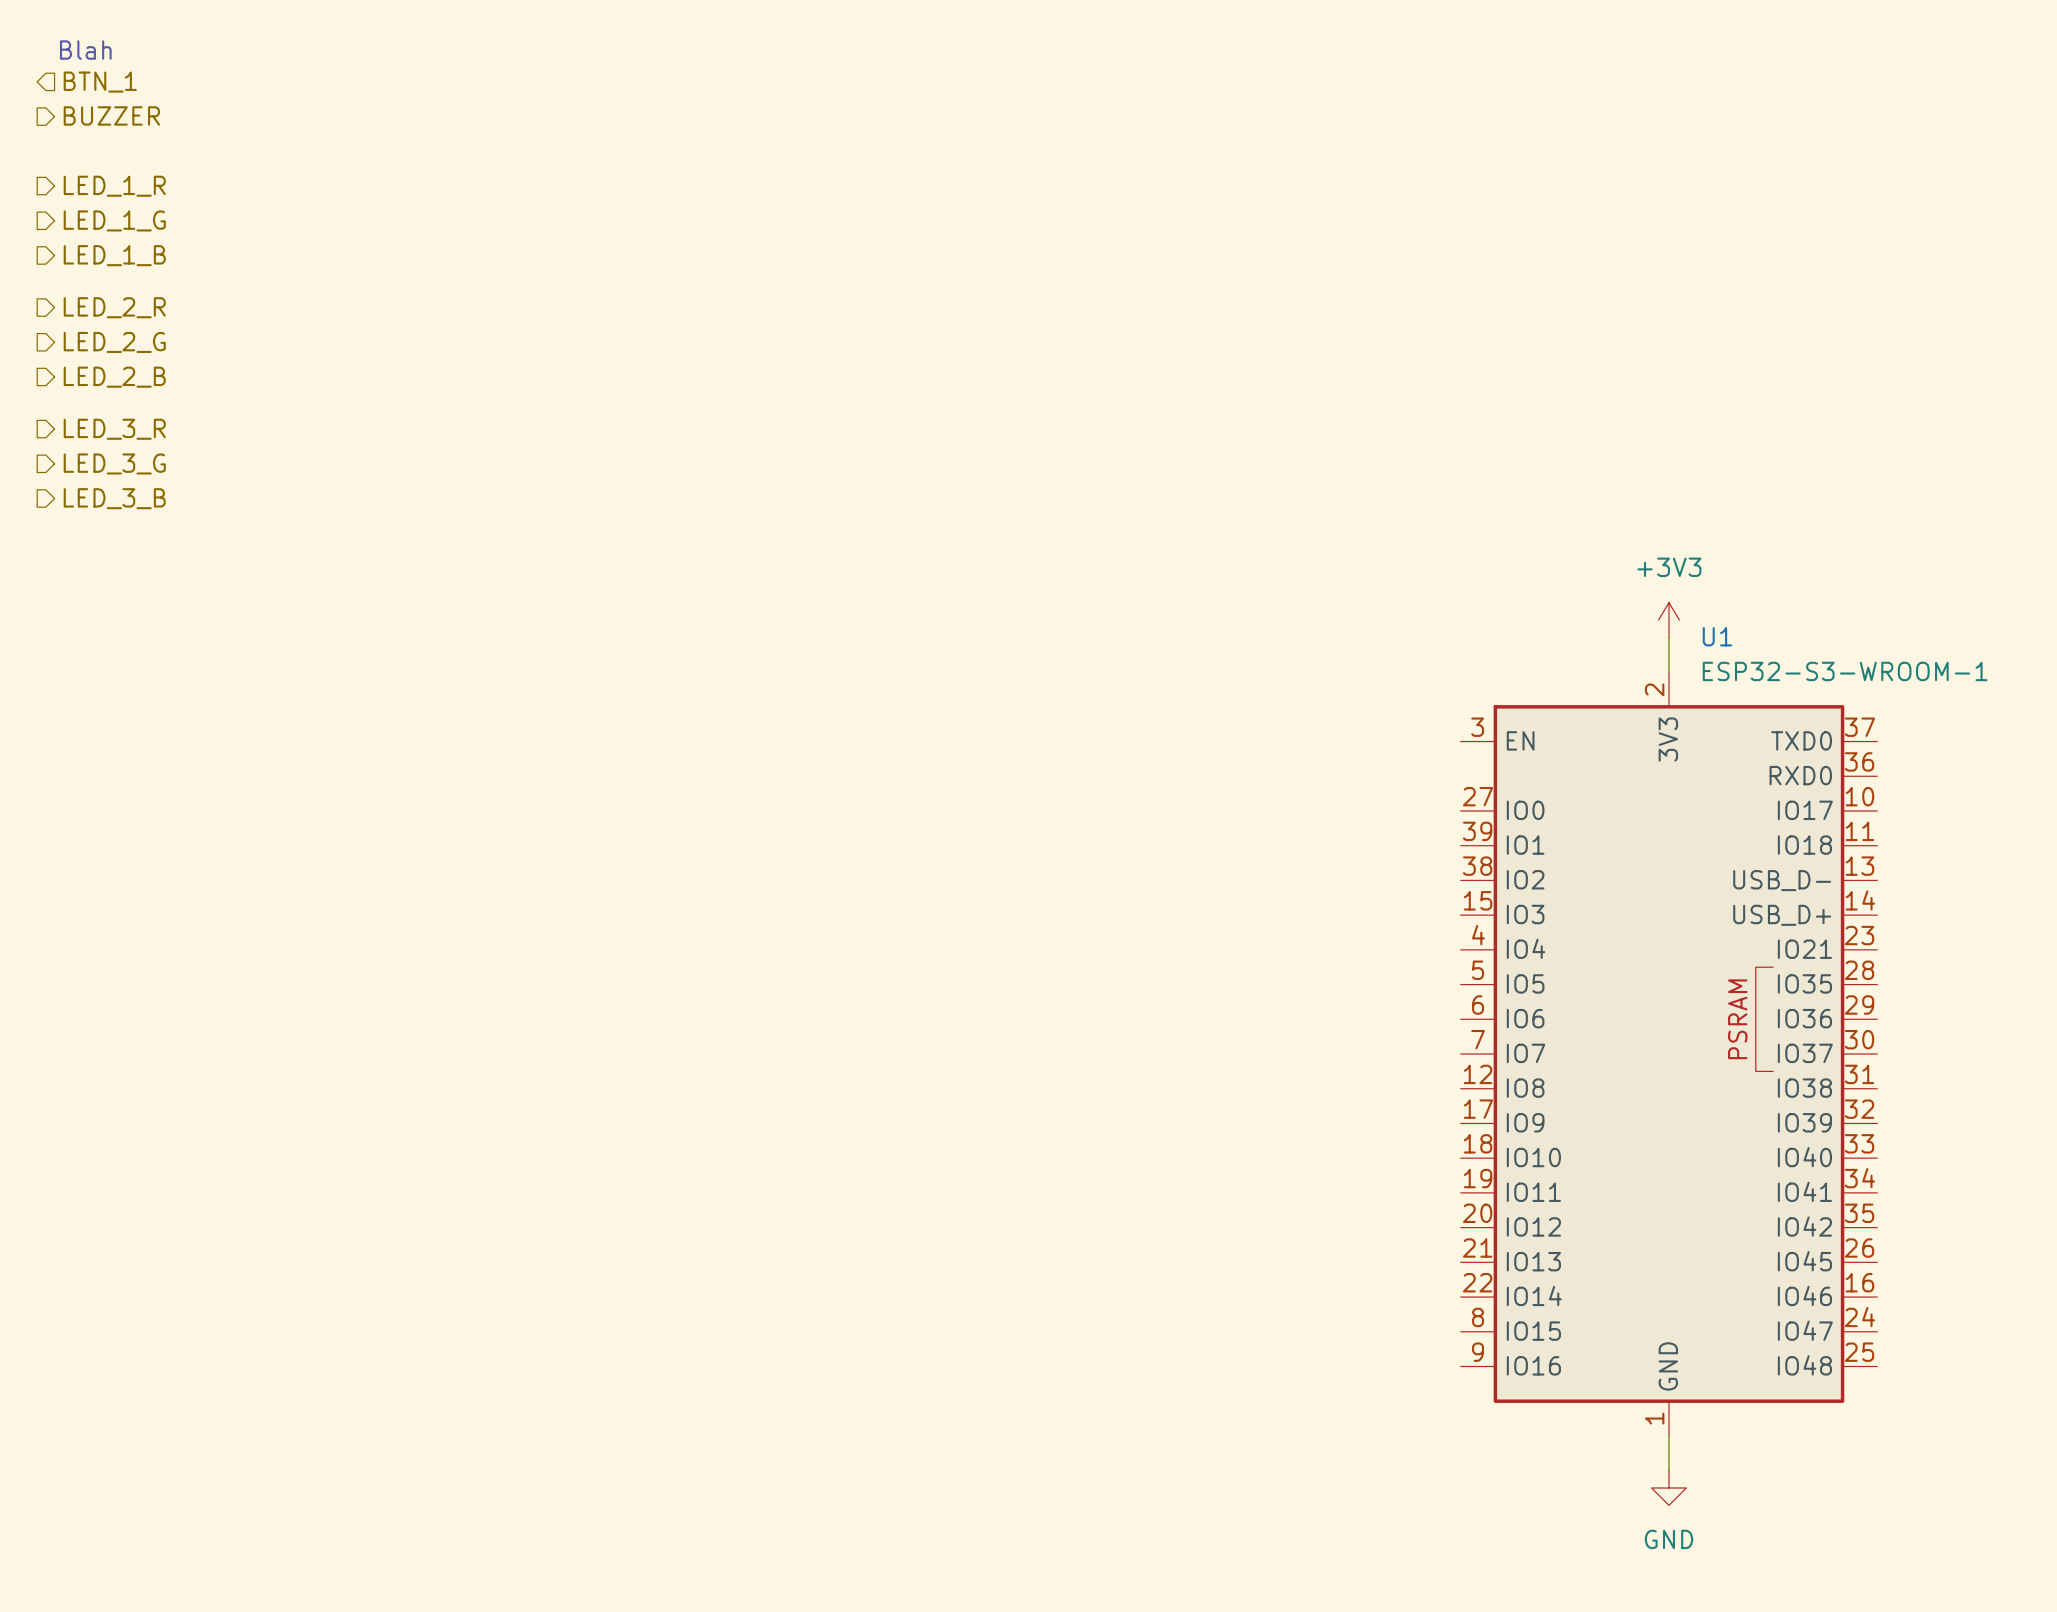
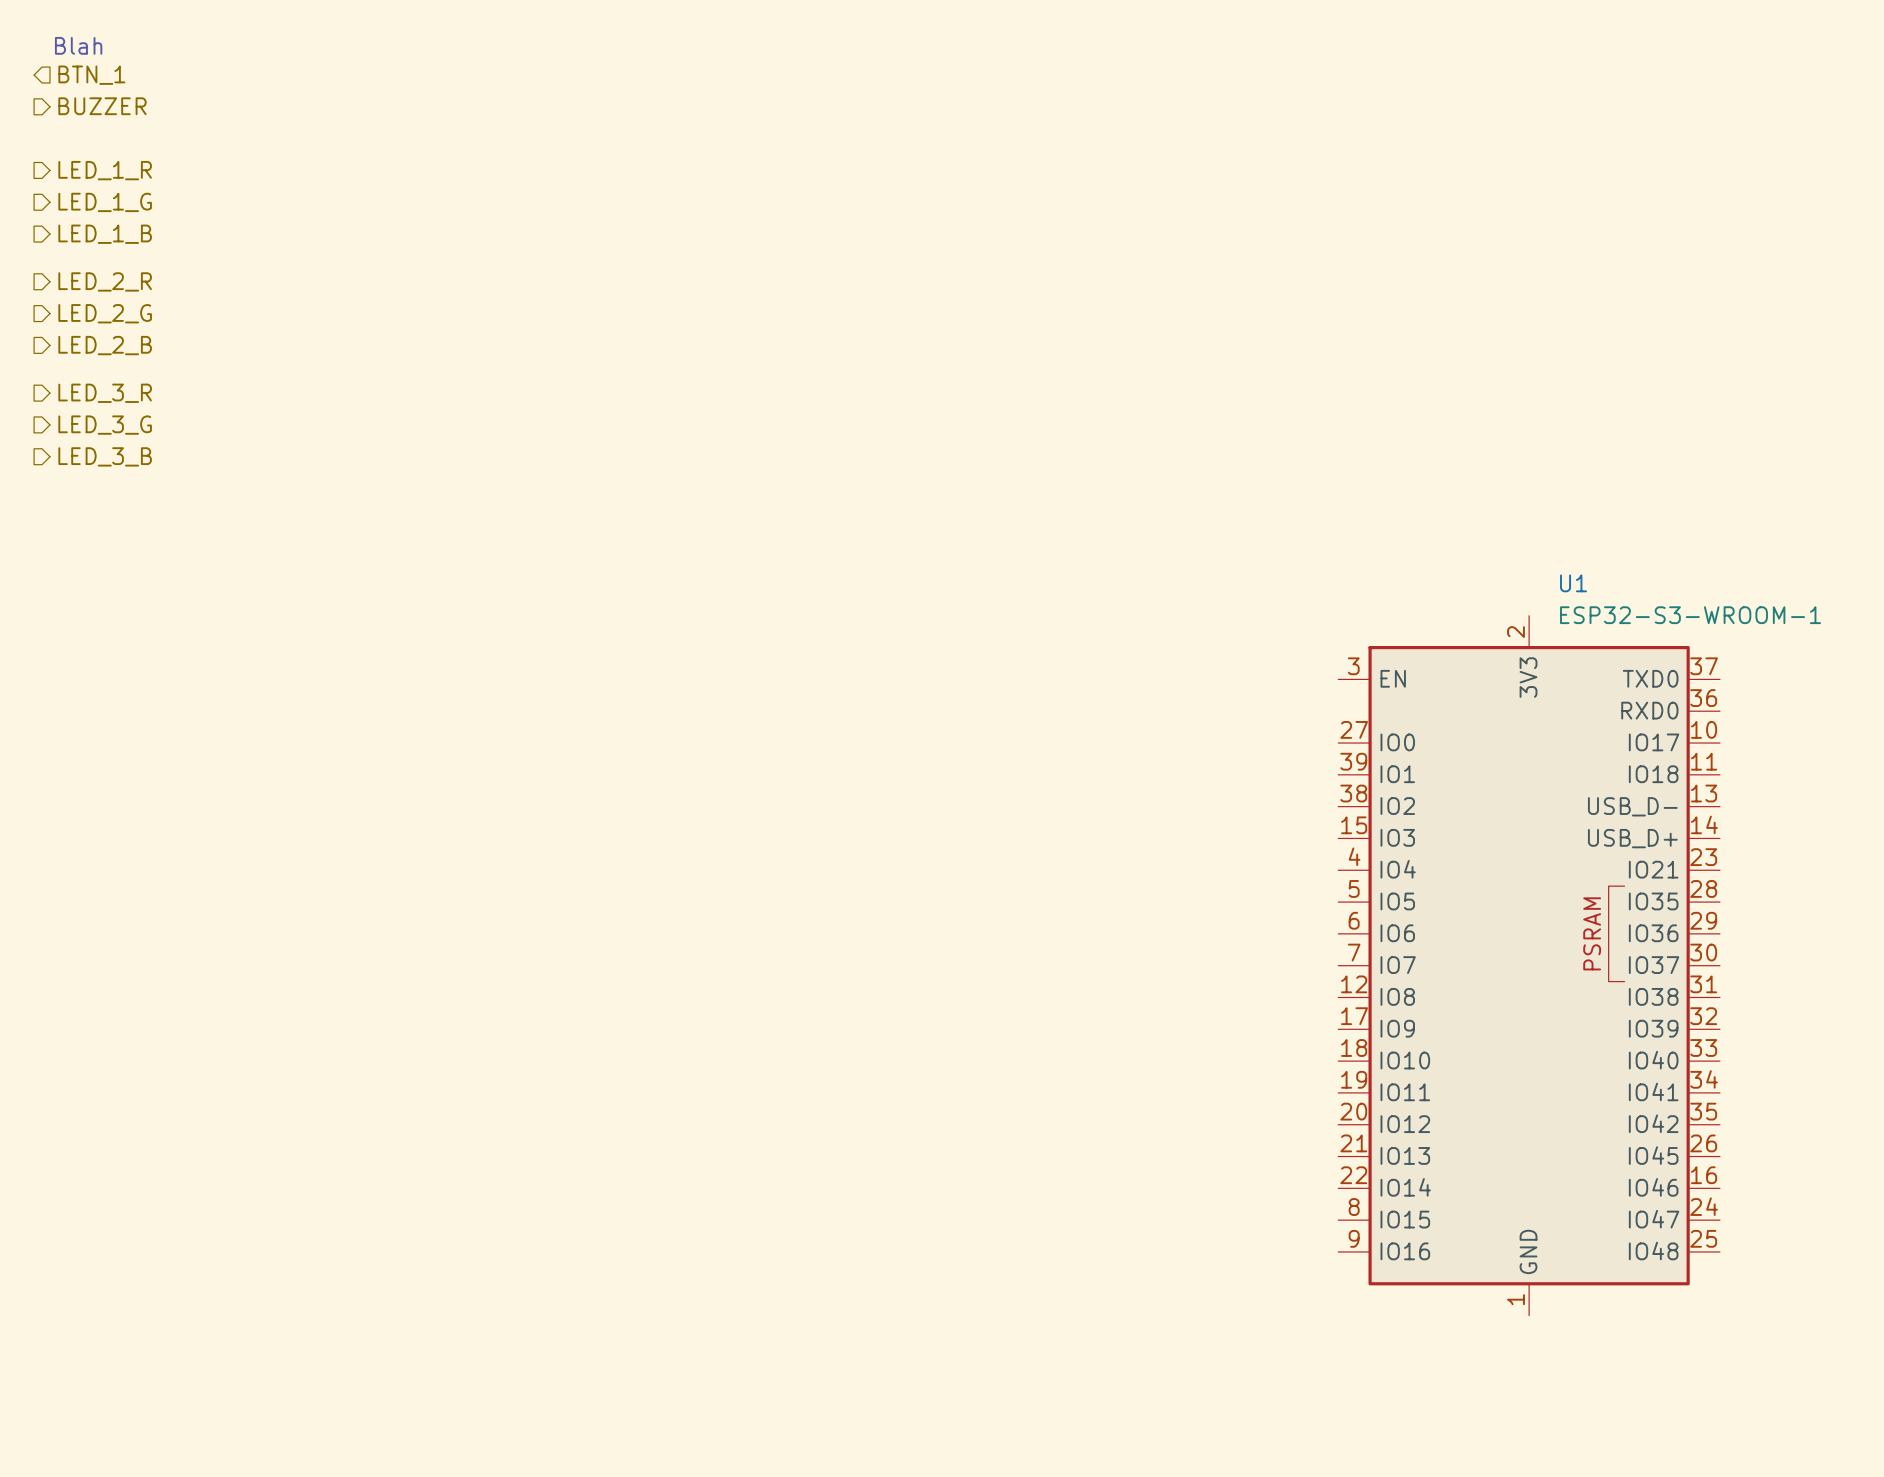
power symbol: +3V3 (1668, 620) -> none
wire: (1668, 637) (1668, 672) -> none
wire: (1668, 1435) (1668, 1470) -> none
power symbol: GND (1668, 1487) -> none

